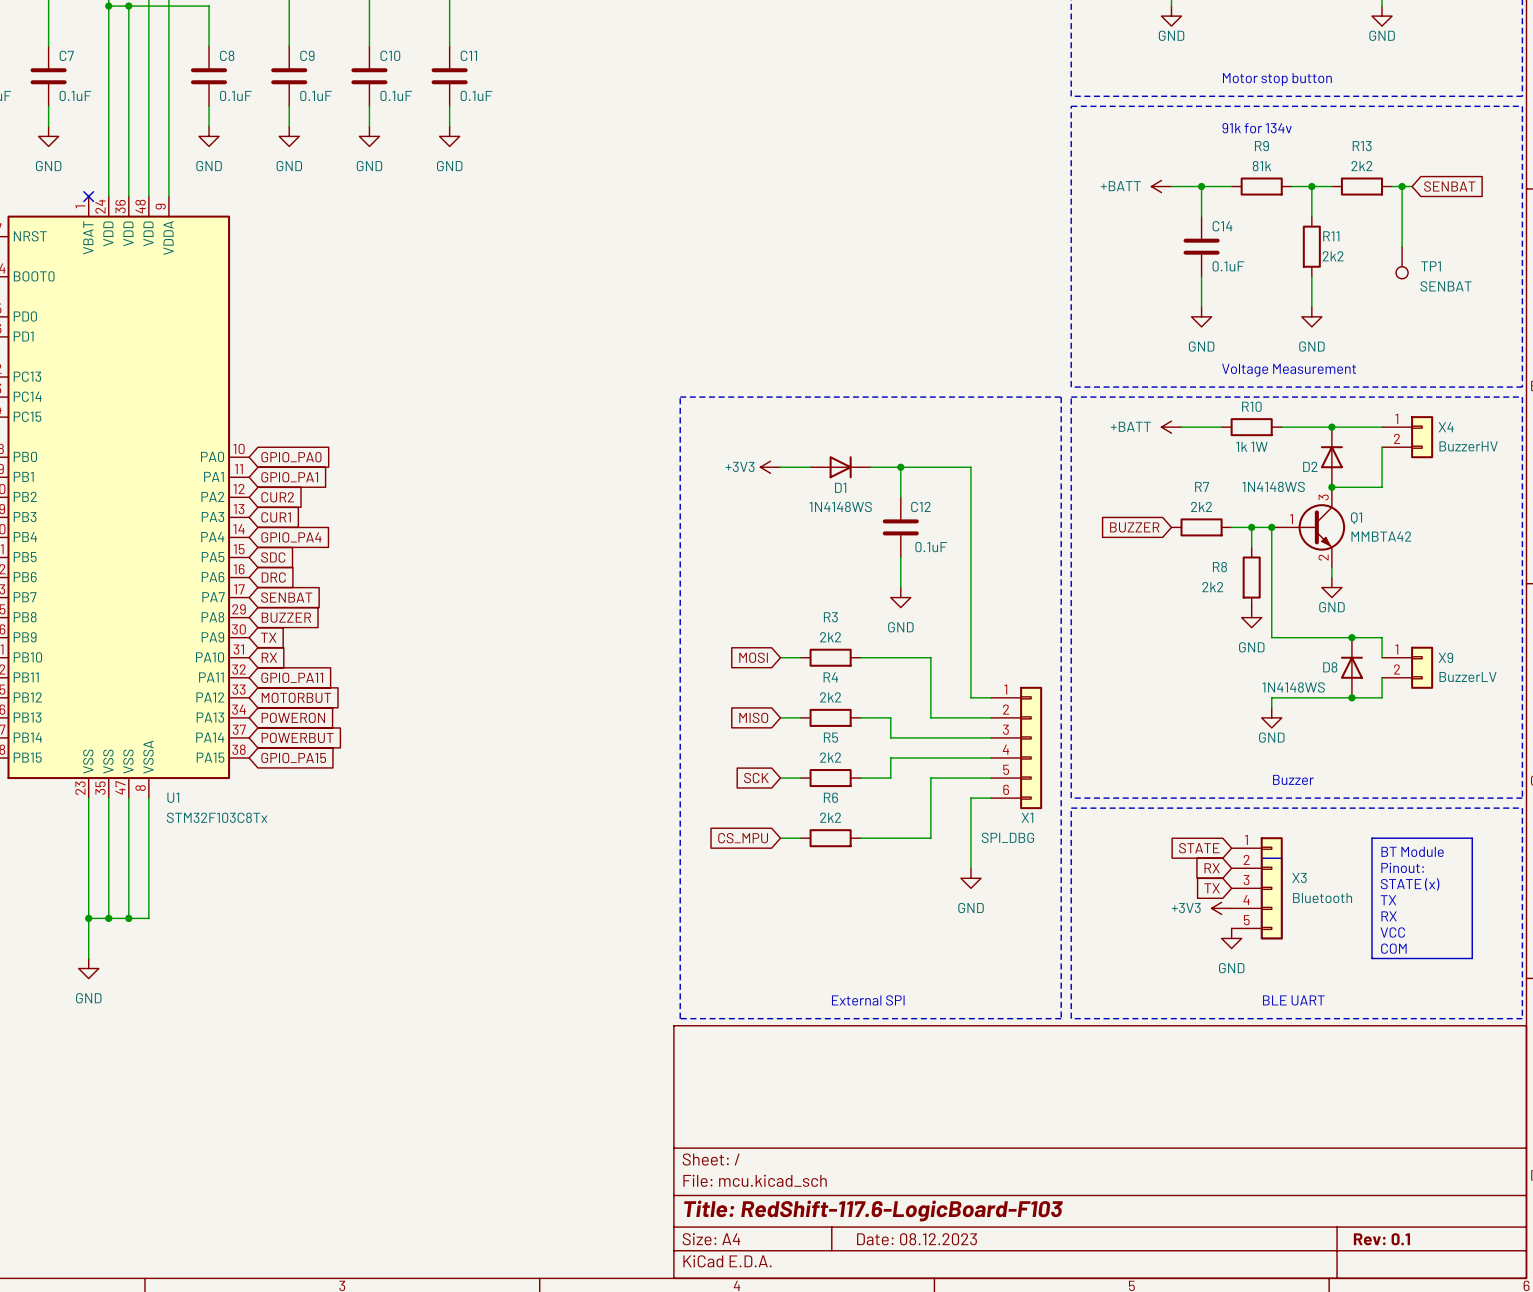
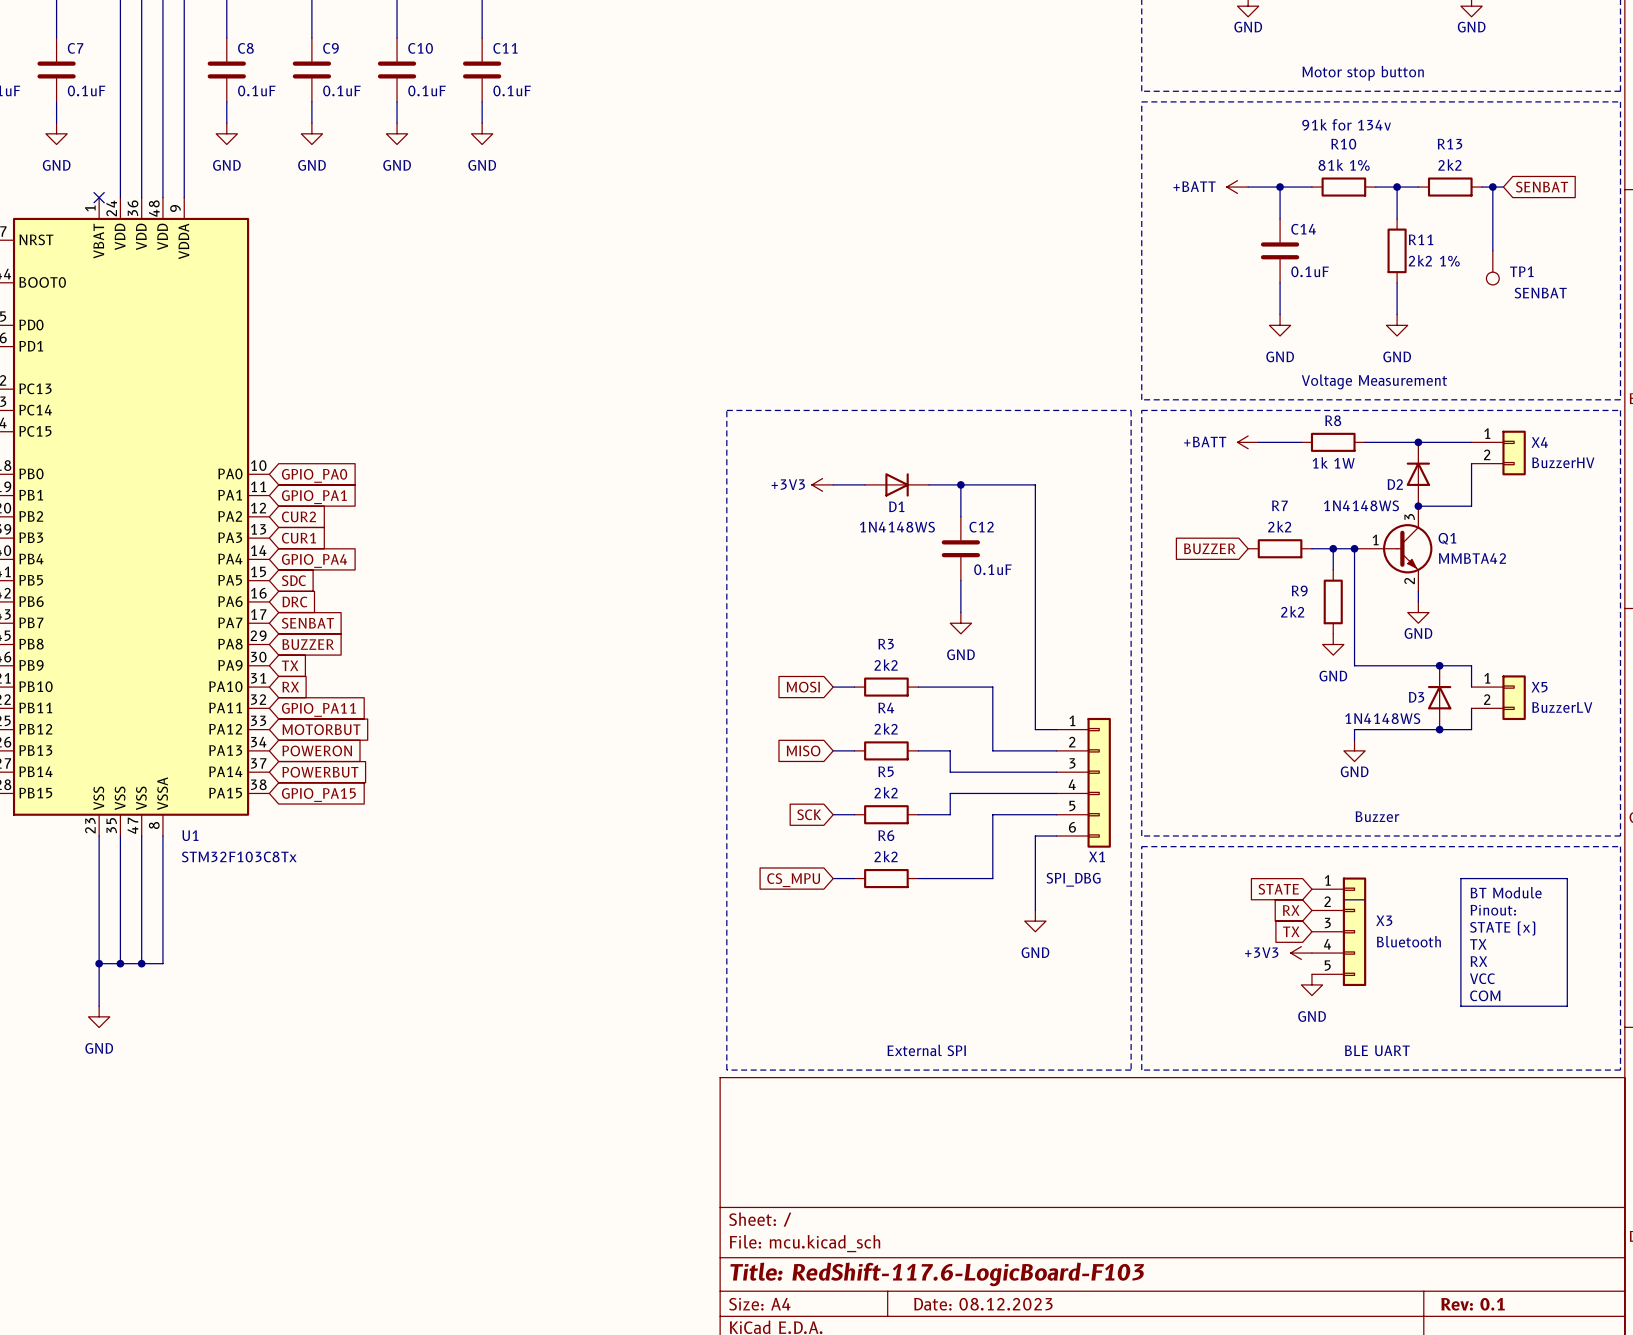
R9 name: R9 (1261, 146) -> R10 (1343, 144)
R9 value: 81k (1261, 166) -> 81k 1% (1344, 165)
R11 value: 2k2 (1333, 256) -> 2k2 1% (1434, 260)
R10 name: R10 (1251, 406) -> R8 (1333, 420)
R8 name: R8 (1219, 567) -> R9 (1299, 590)
X9 name: X9 (1445, 657) -> X5 (1539, 687)
D8 name: D8 (1330, 667) -> D3 (1416, 697)

